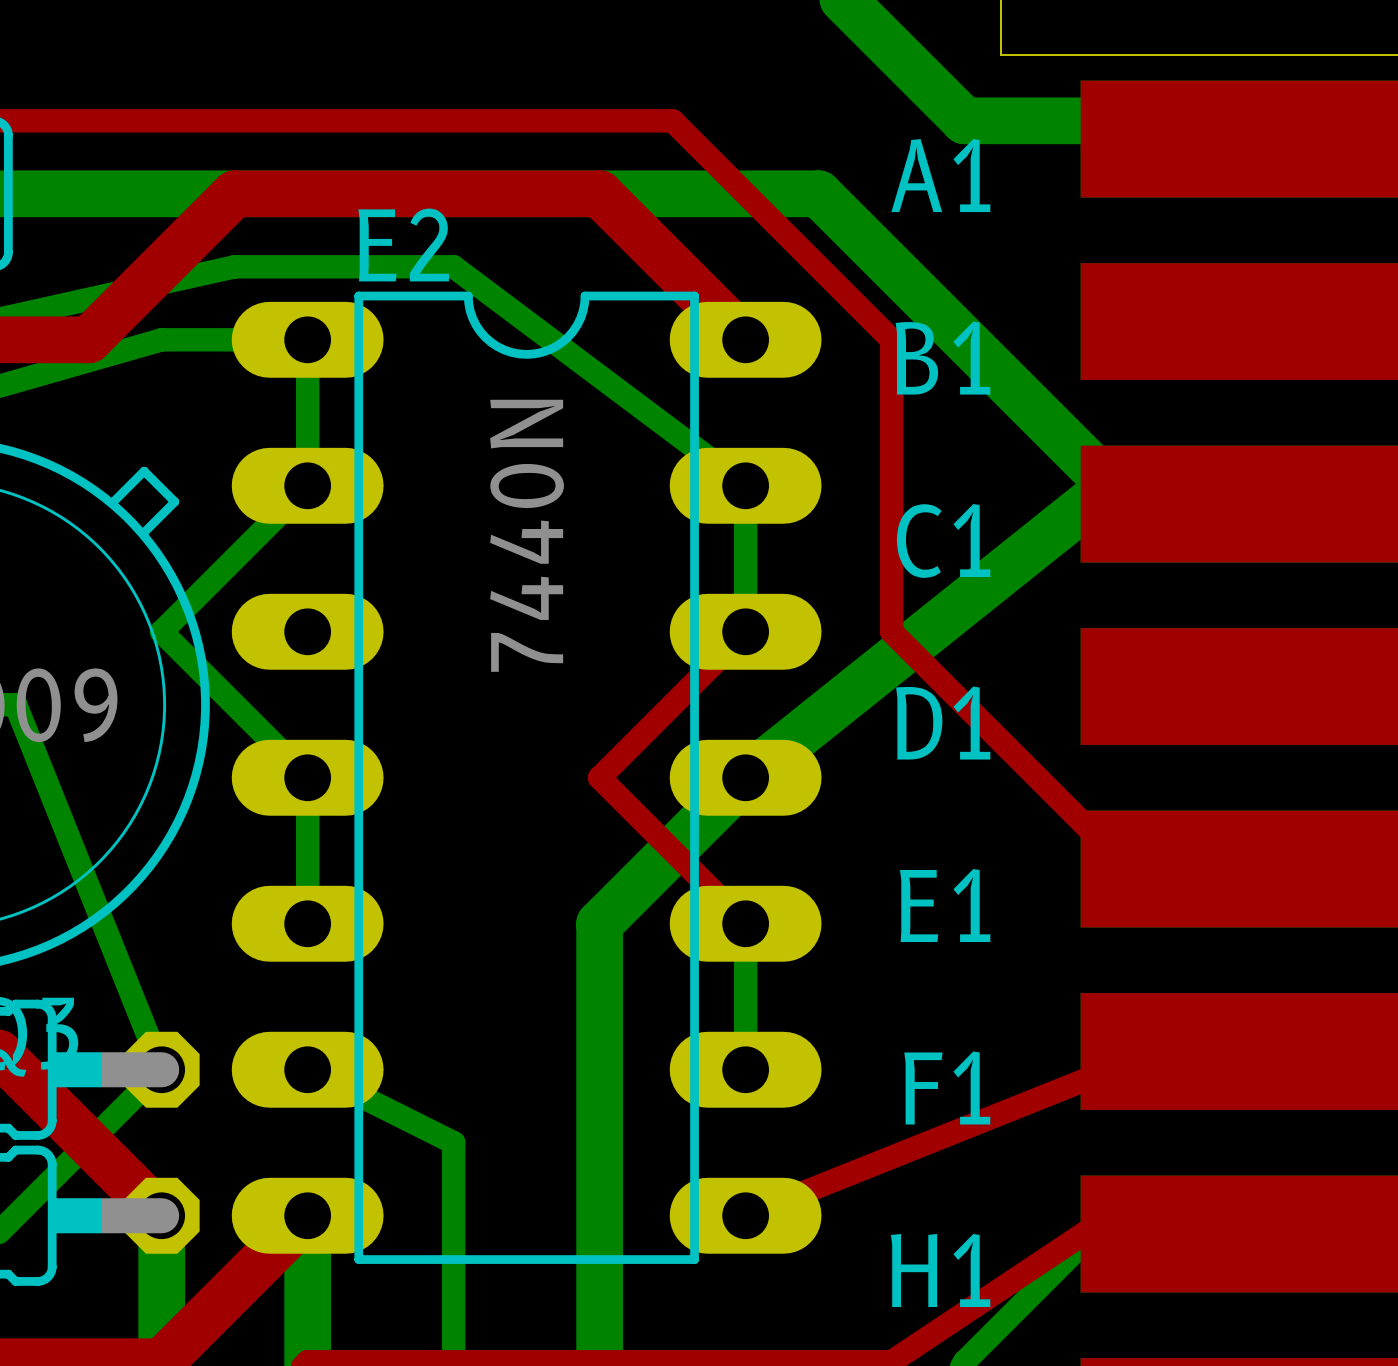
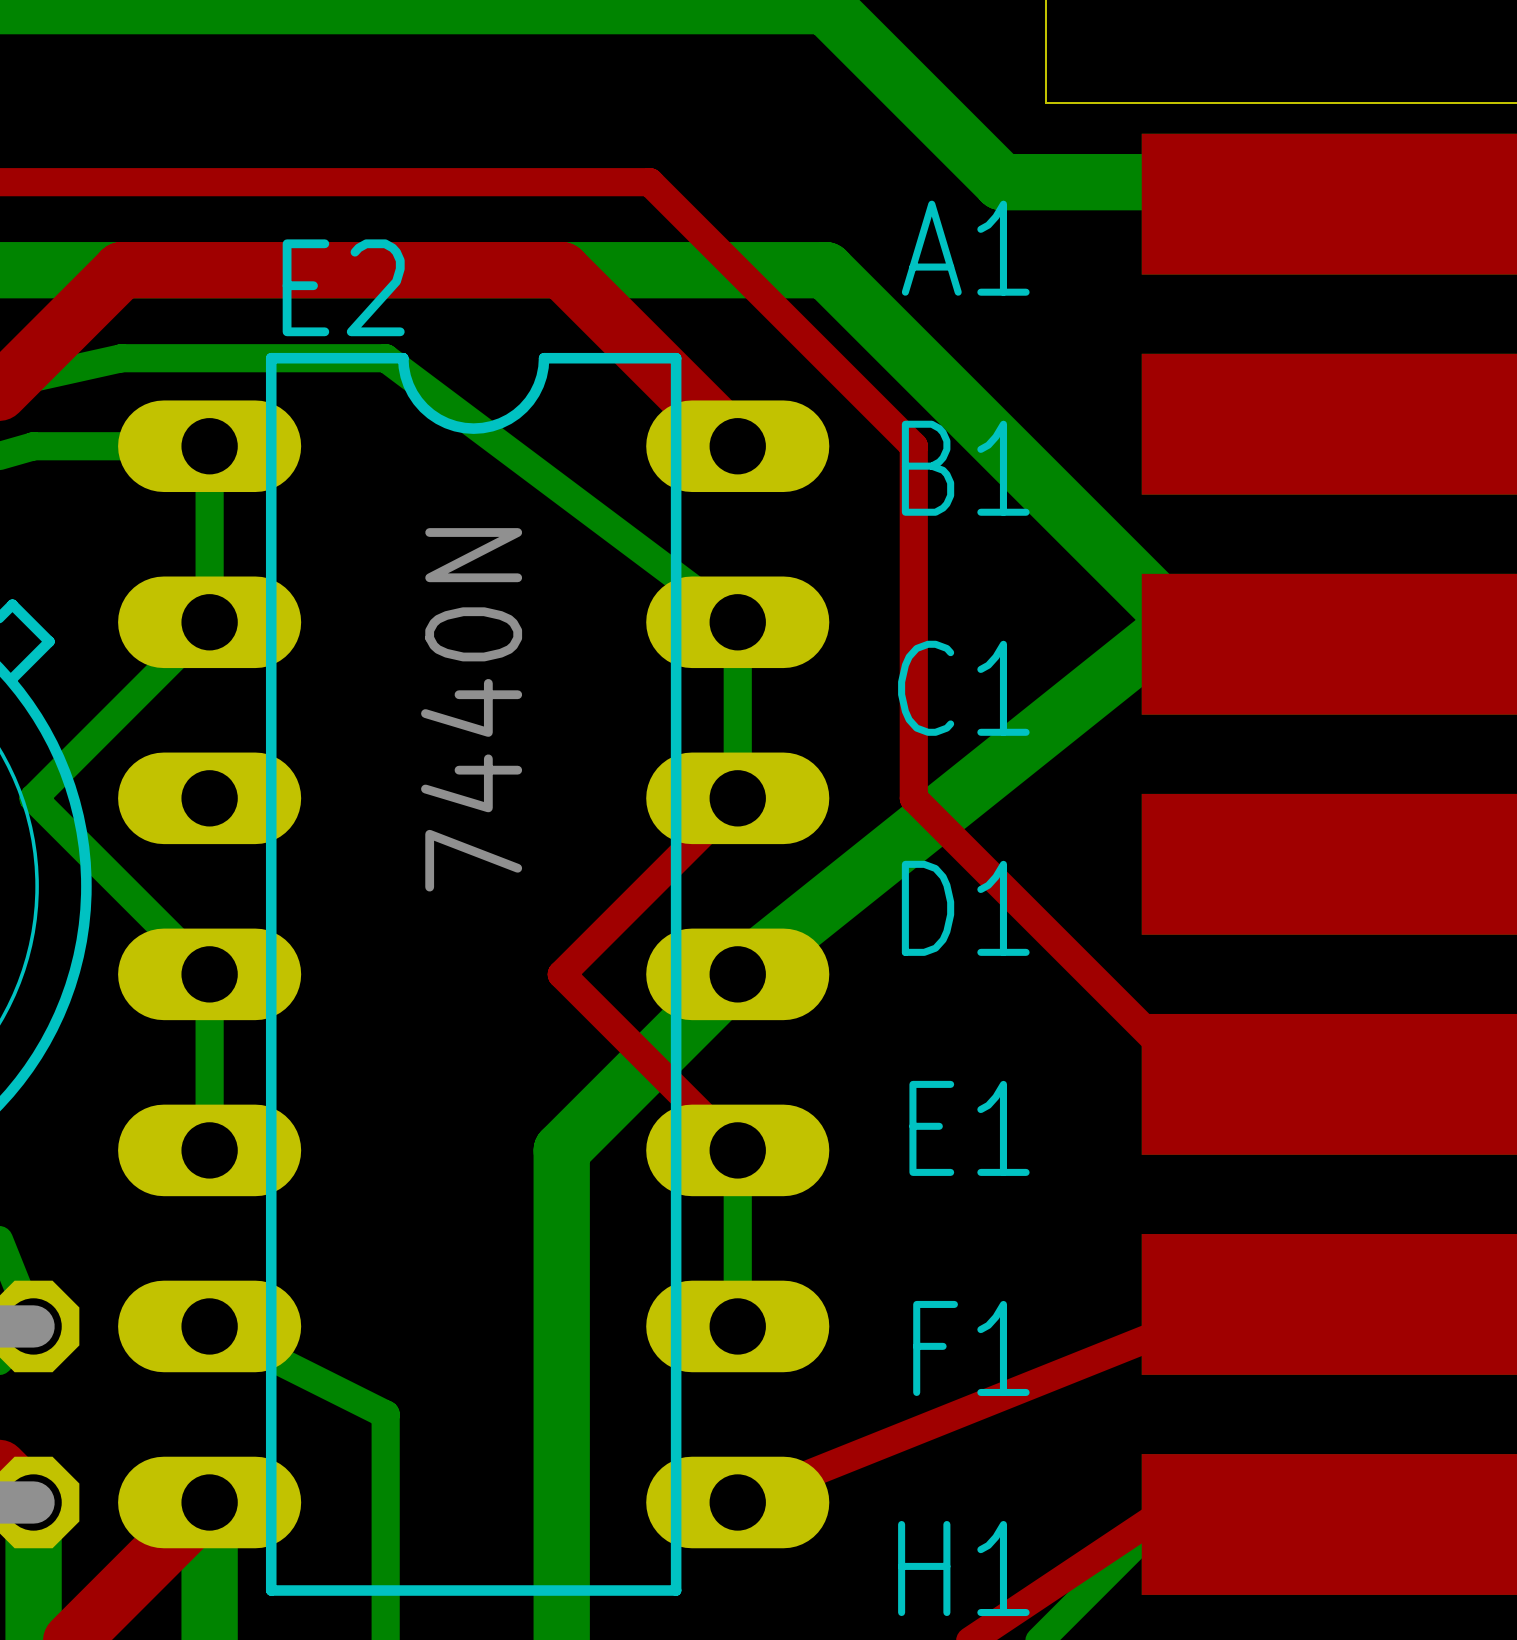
E2 name position: E2 (403, 244) -> E2 (343, 287)
E2 footprint: [231, 291, 822, 1264] -> [118, 352, 830, 1596]

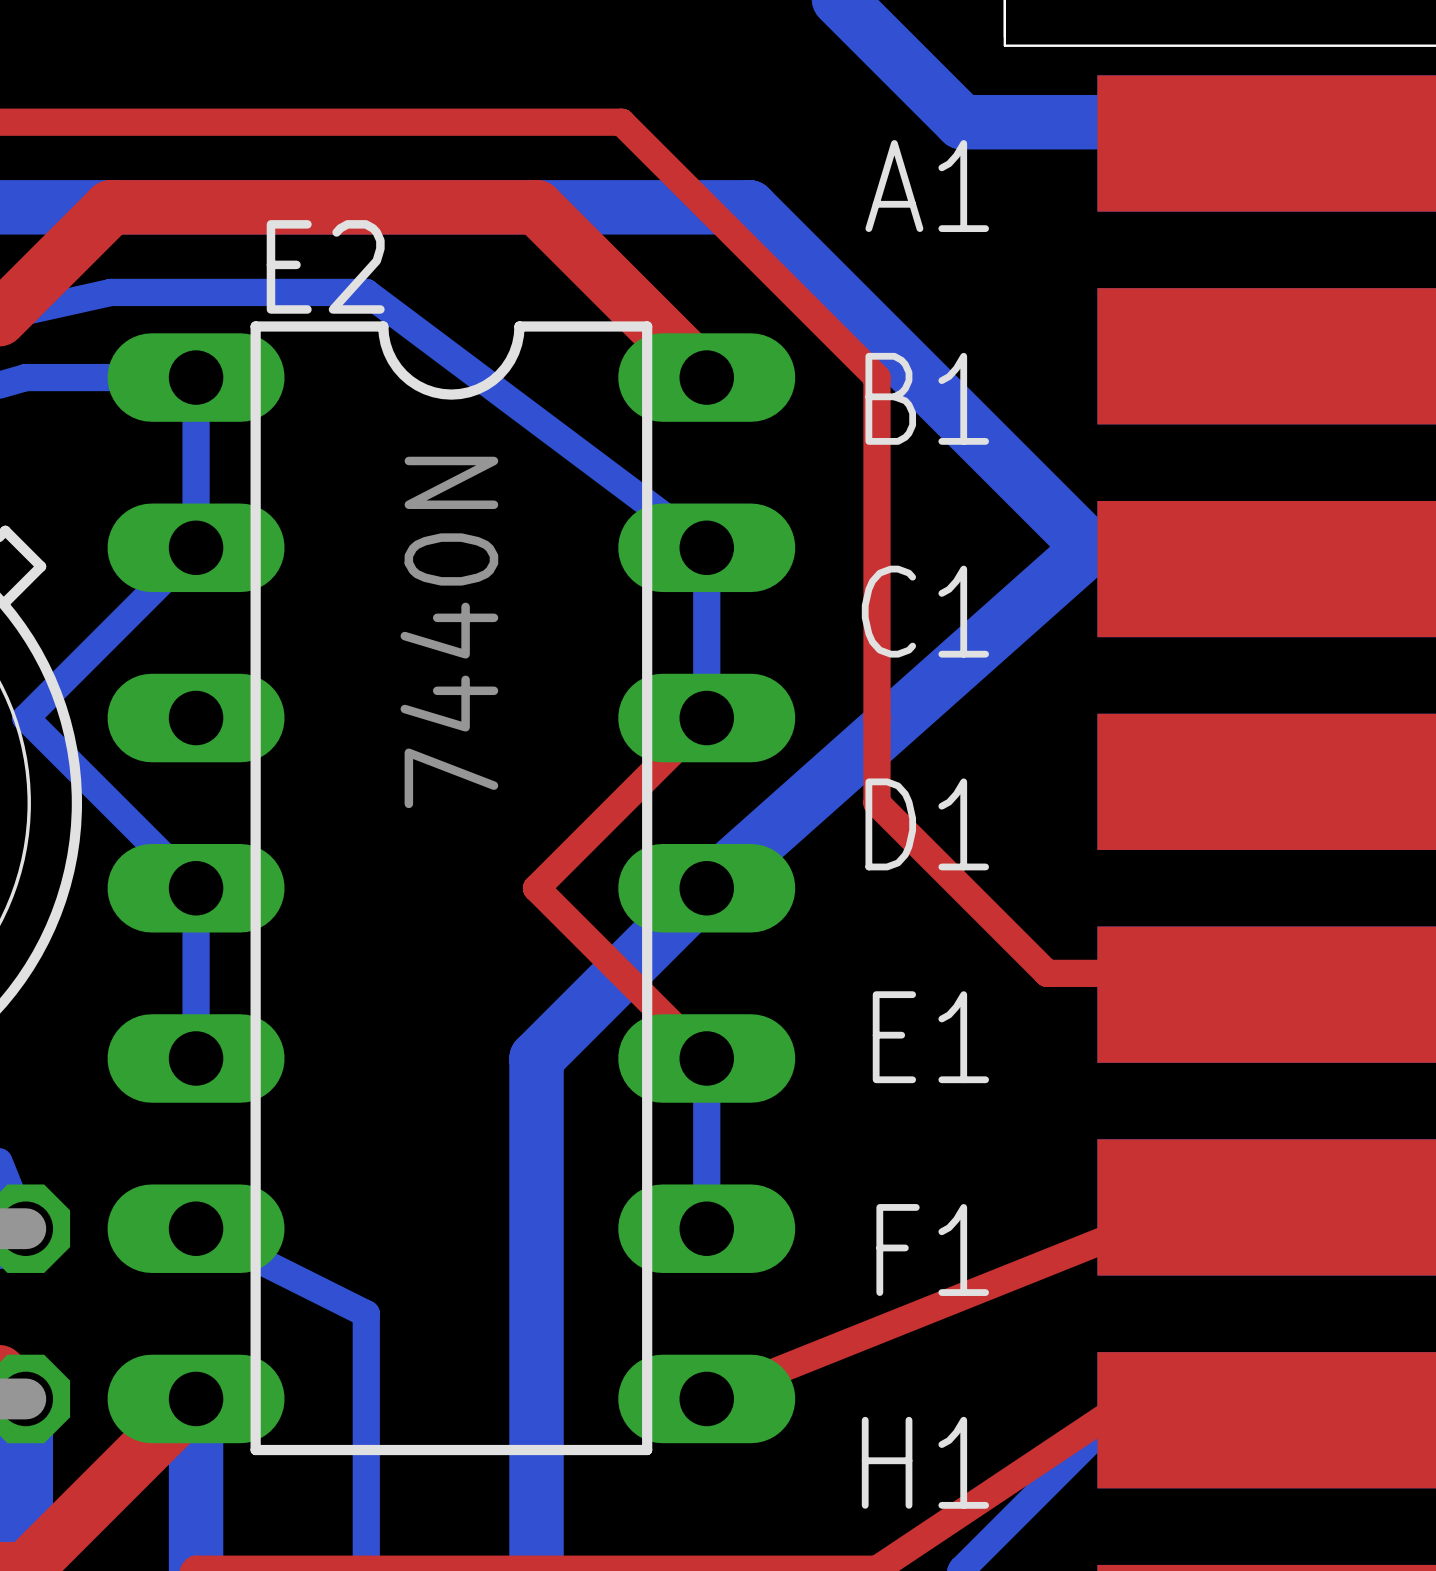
bottom track: (781, 270) (825, 270) (1177, 622) (737, 974) -> (1089, 547) (706, 888)
bottom track: none -> (749, 207) (1089, 547)
E2 name position: E2 (343, 287) -> E2 (325, 266)
E2 footprint: [118, 352, 830, 1596] -> [107, 321, 796, 1456]
top track: (913, 798) (1177, 1062) -> (876, 718) (876, 803) (1047, 973) (1132, 973)

